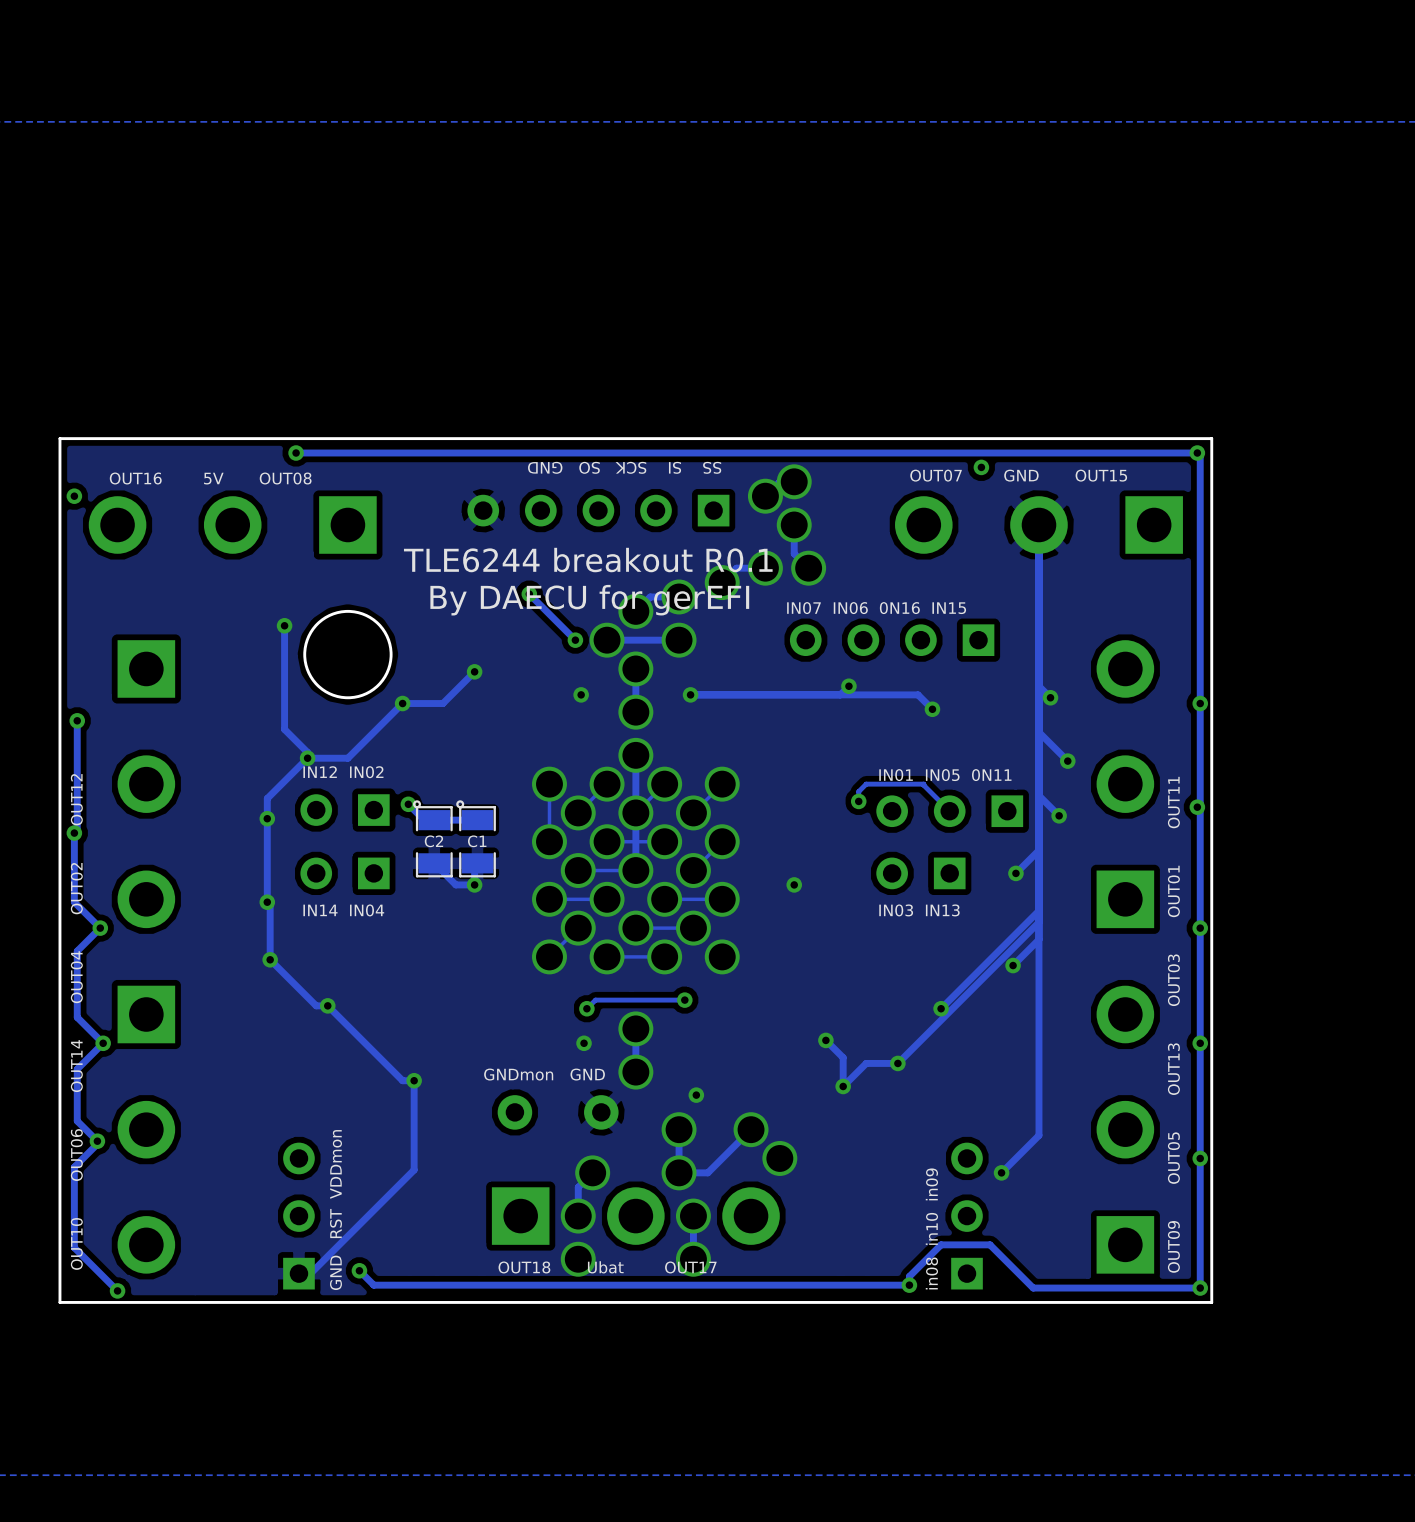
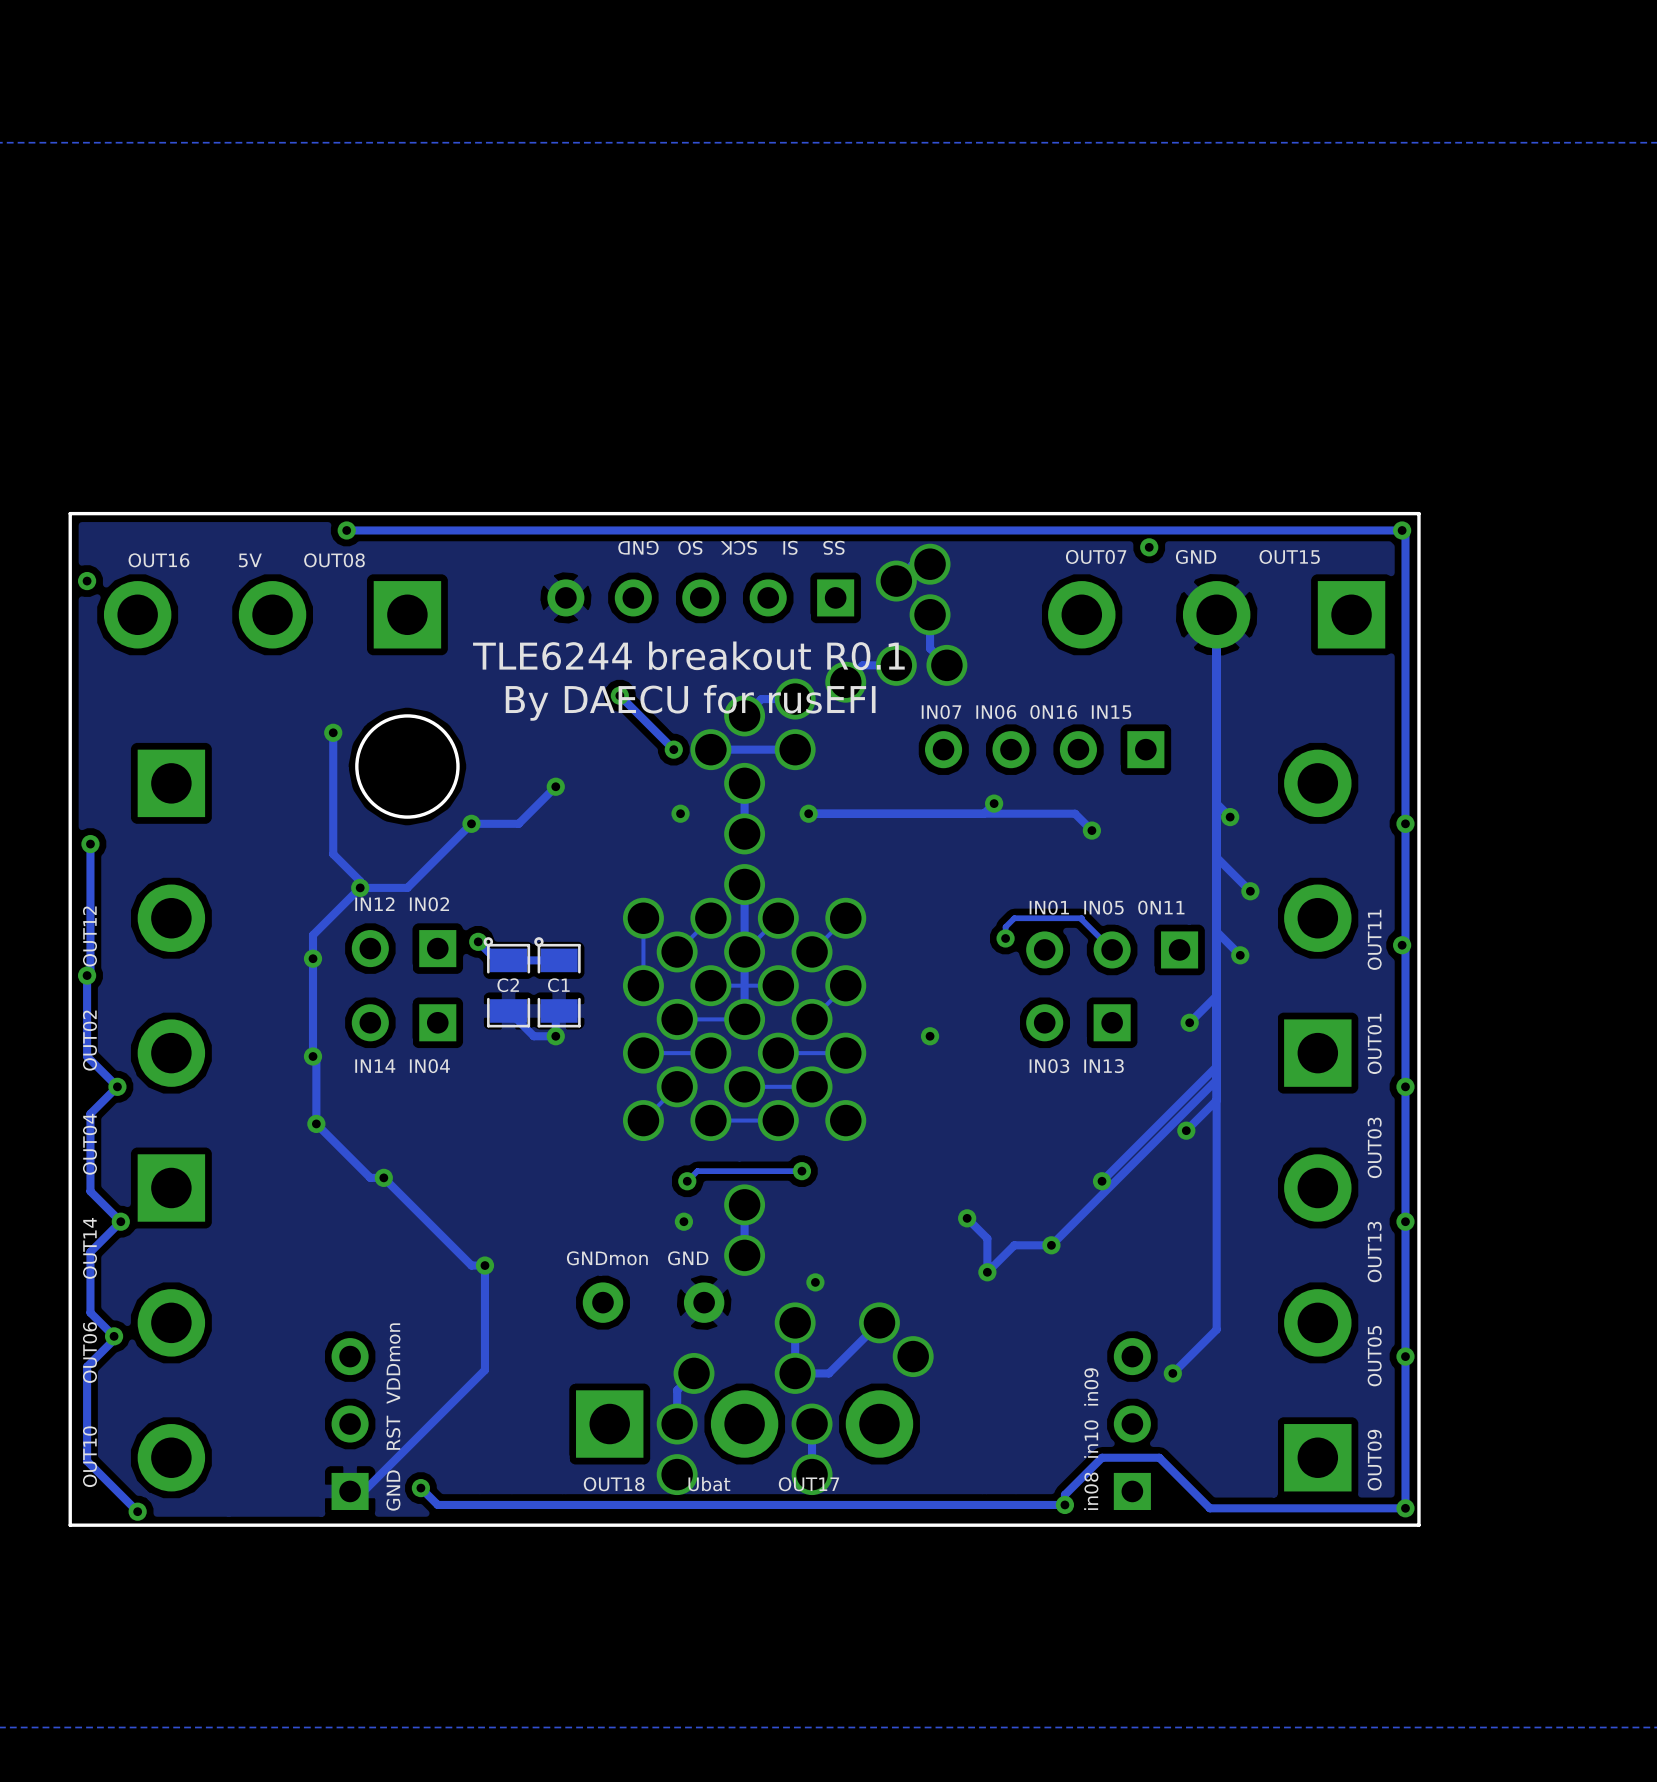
text: By DAECU for gerEFI (589, 600) -> By DAECU for rusEFI (690, 702)

